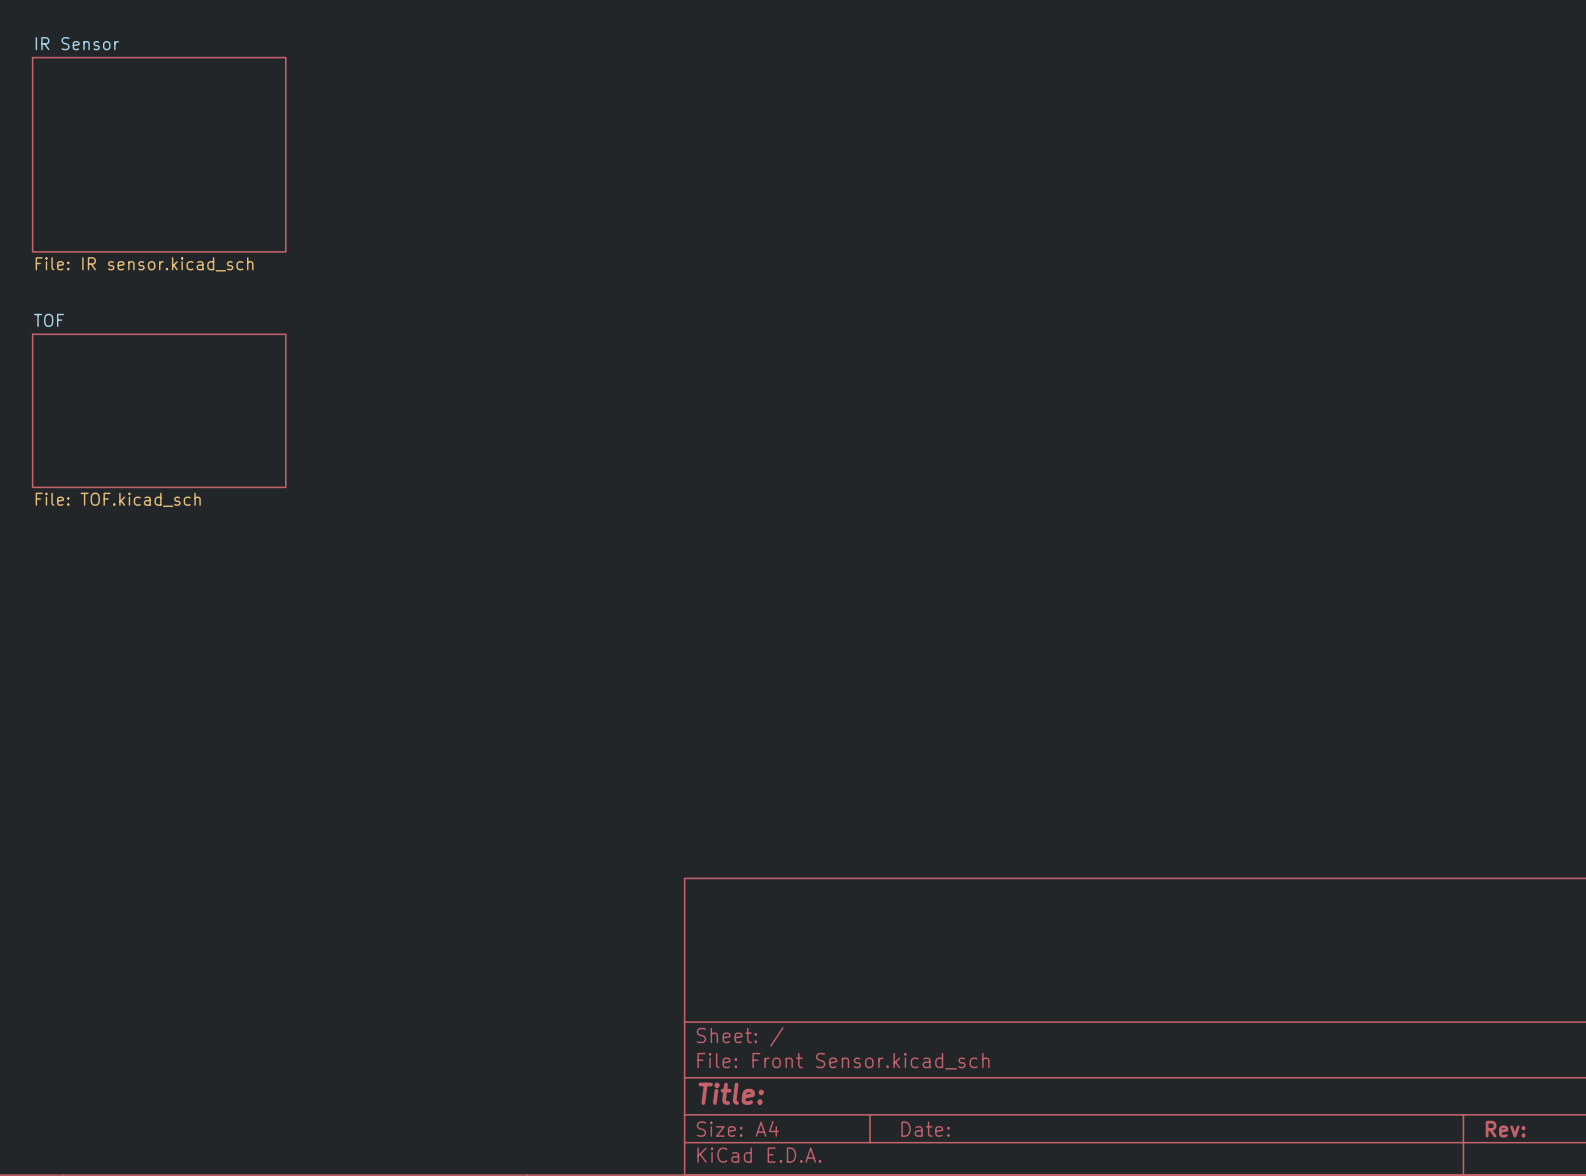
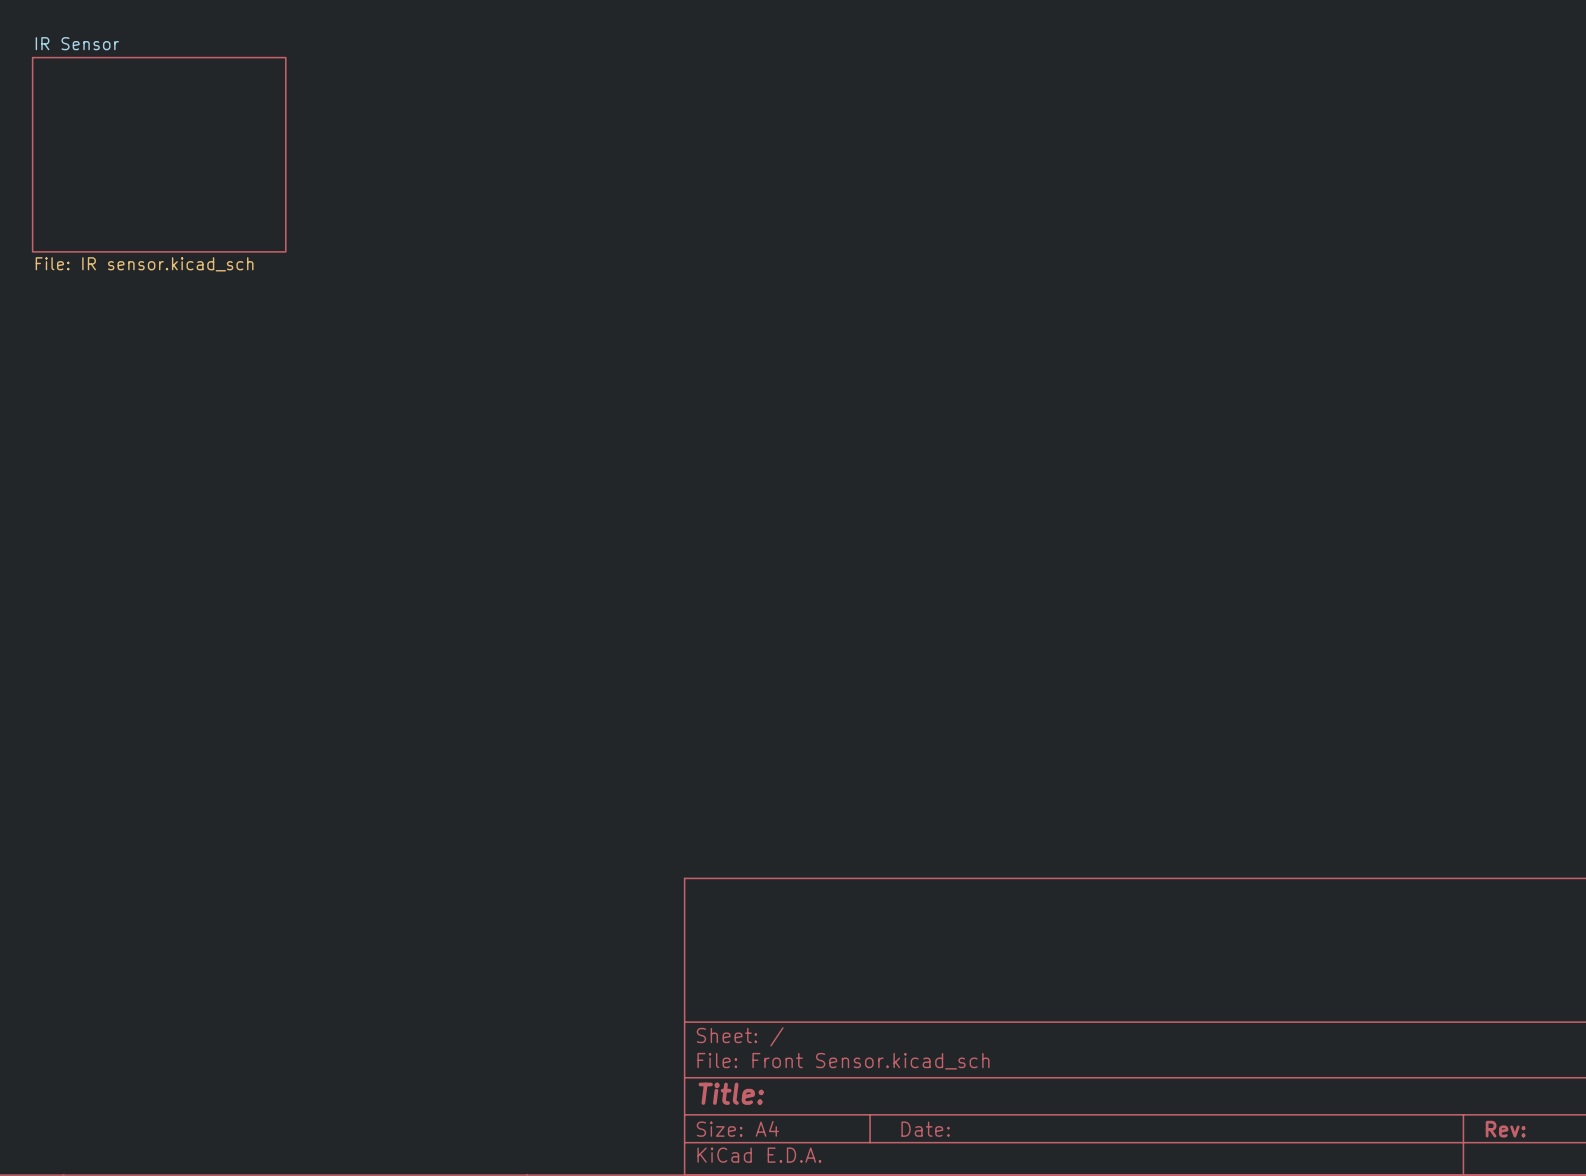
sheet TOF: File: TOF.kicad_sch (159, 410) -> none

